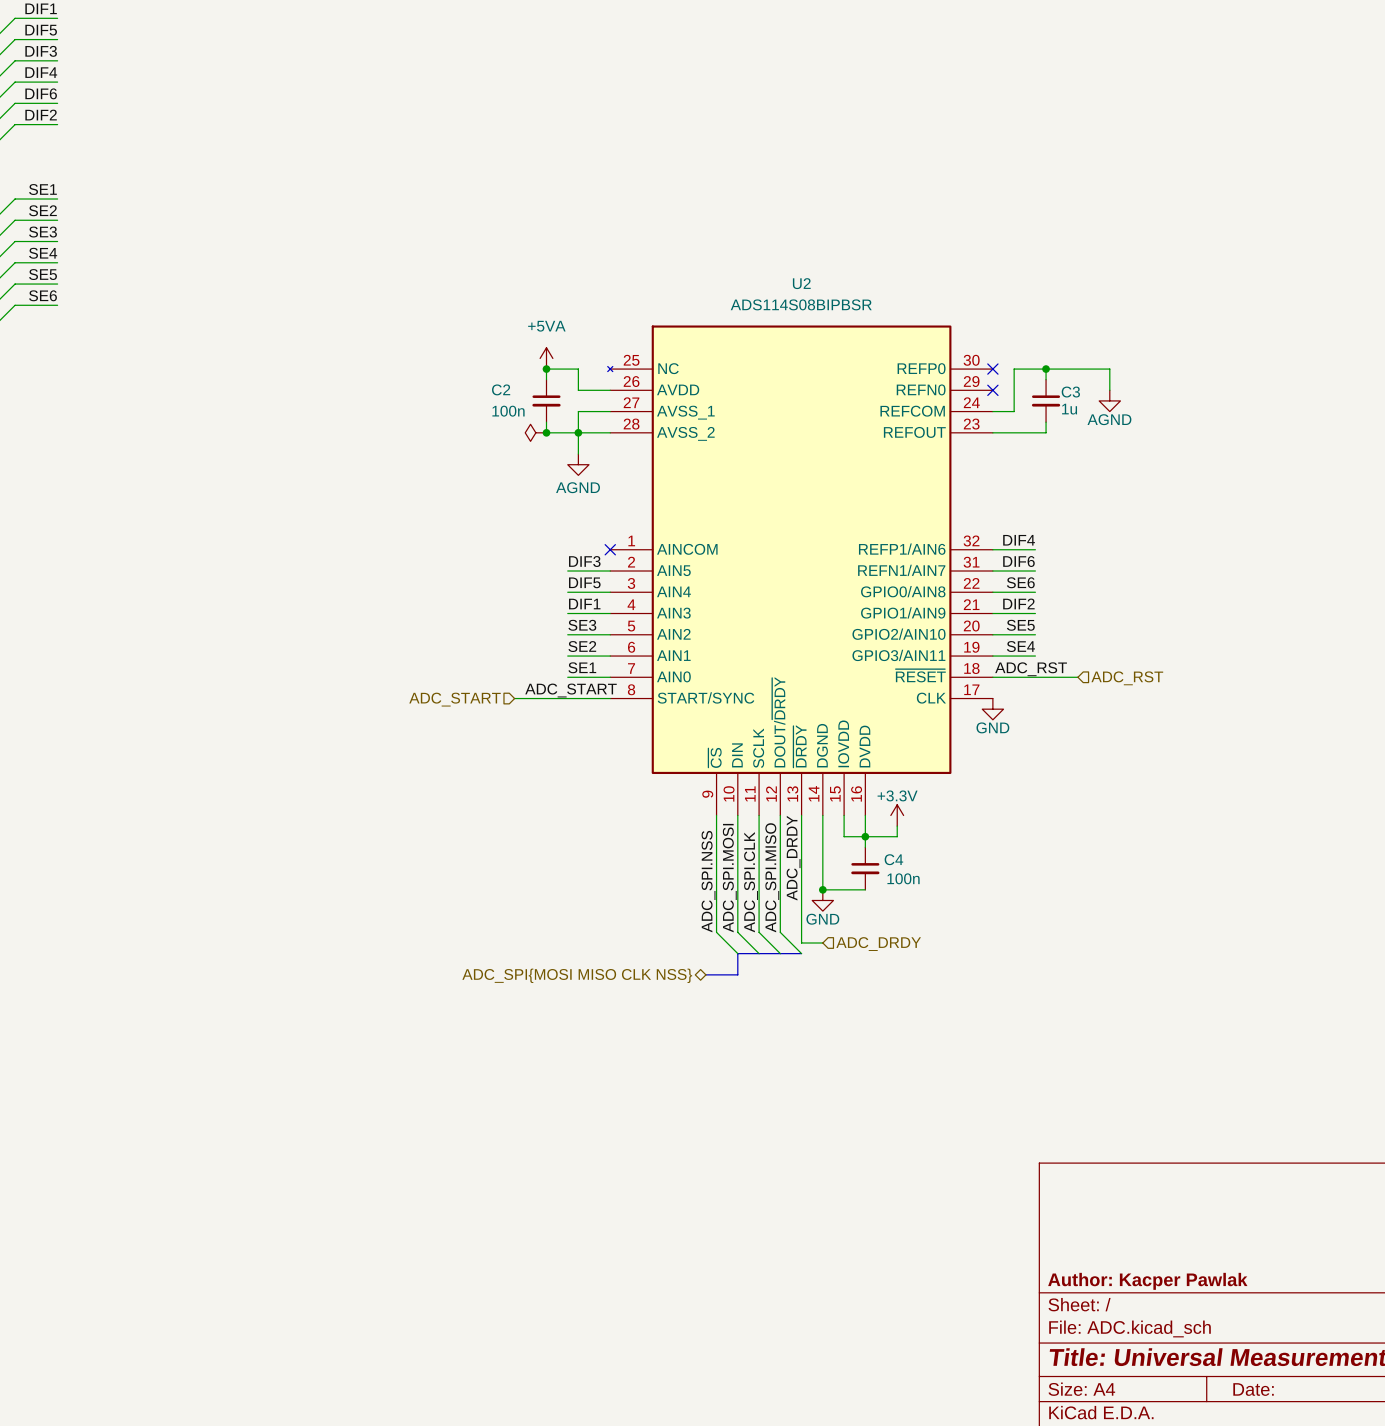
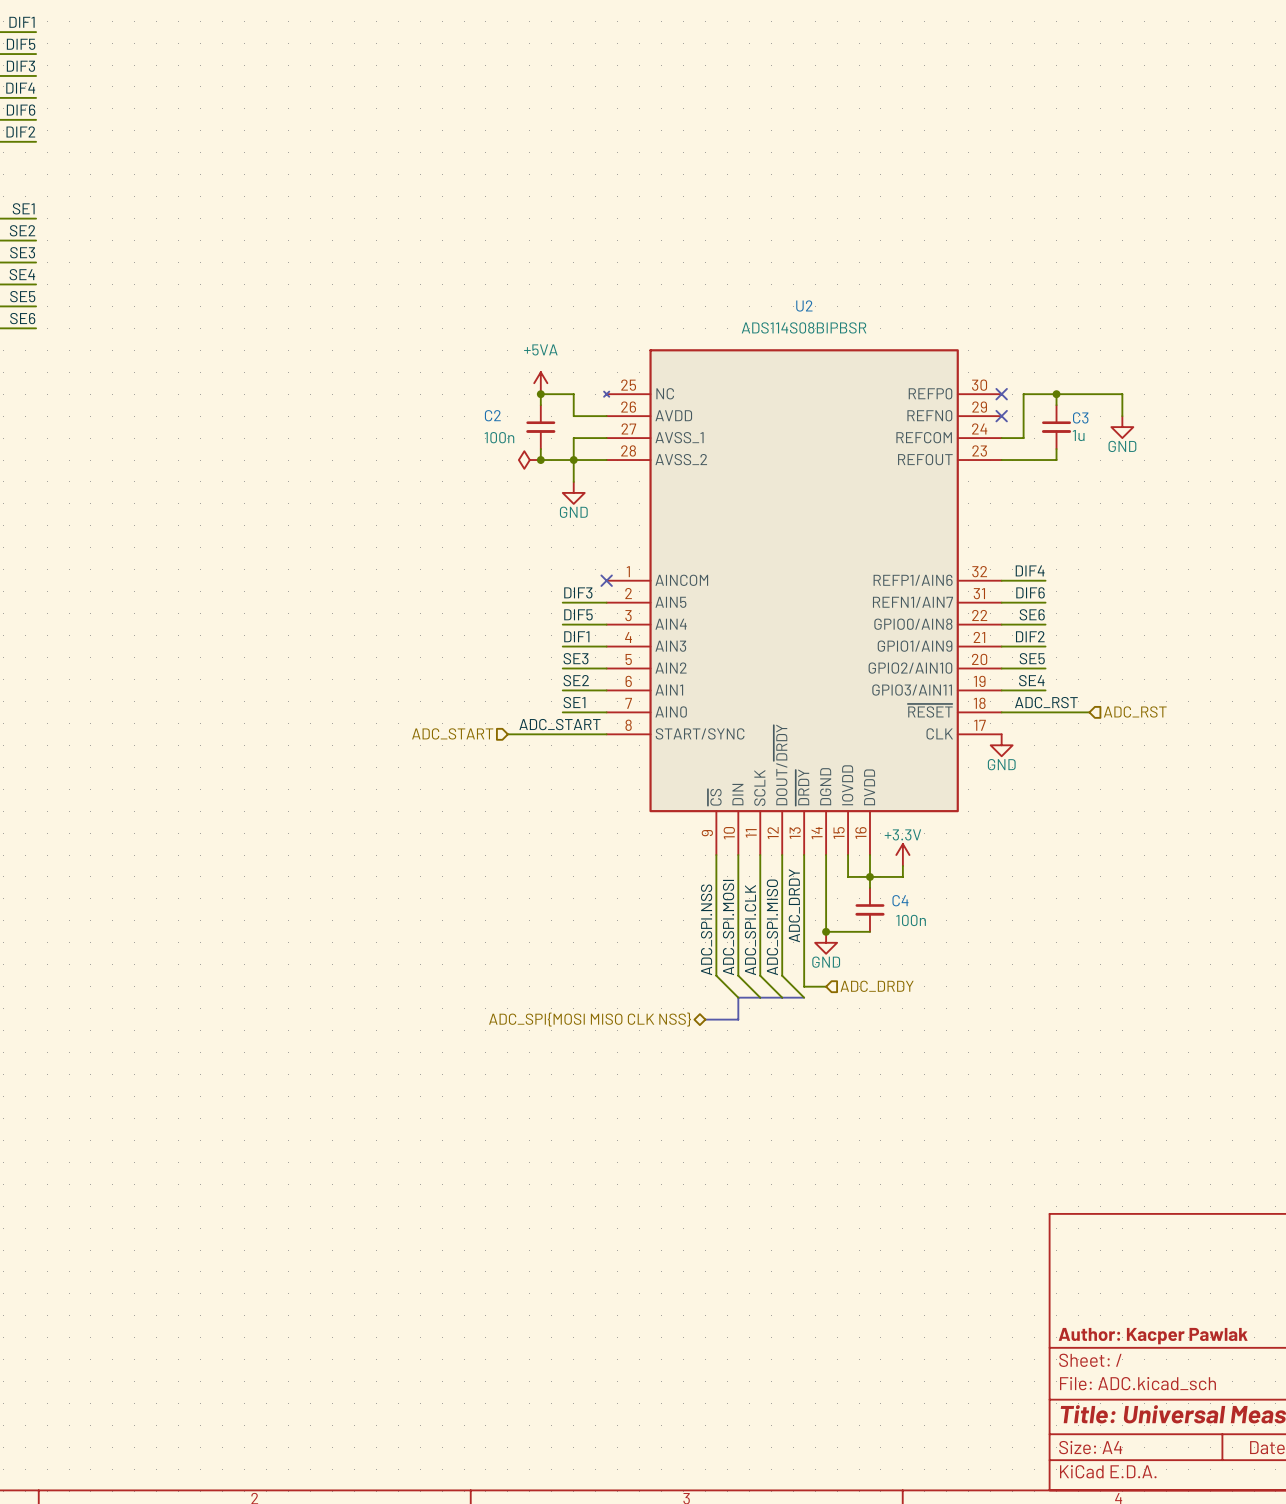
power symbol: AGND (1109, 400) -> GND (1122, 427)
power symbol: AGND (578, 464) -> GND (573, 492)

